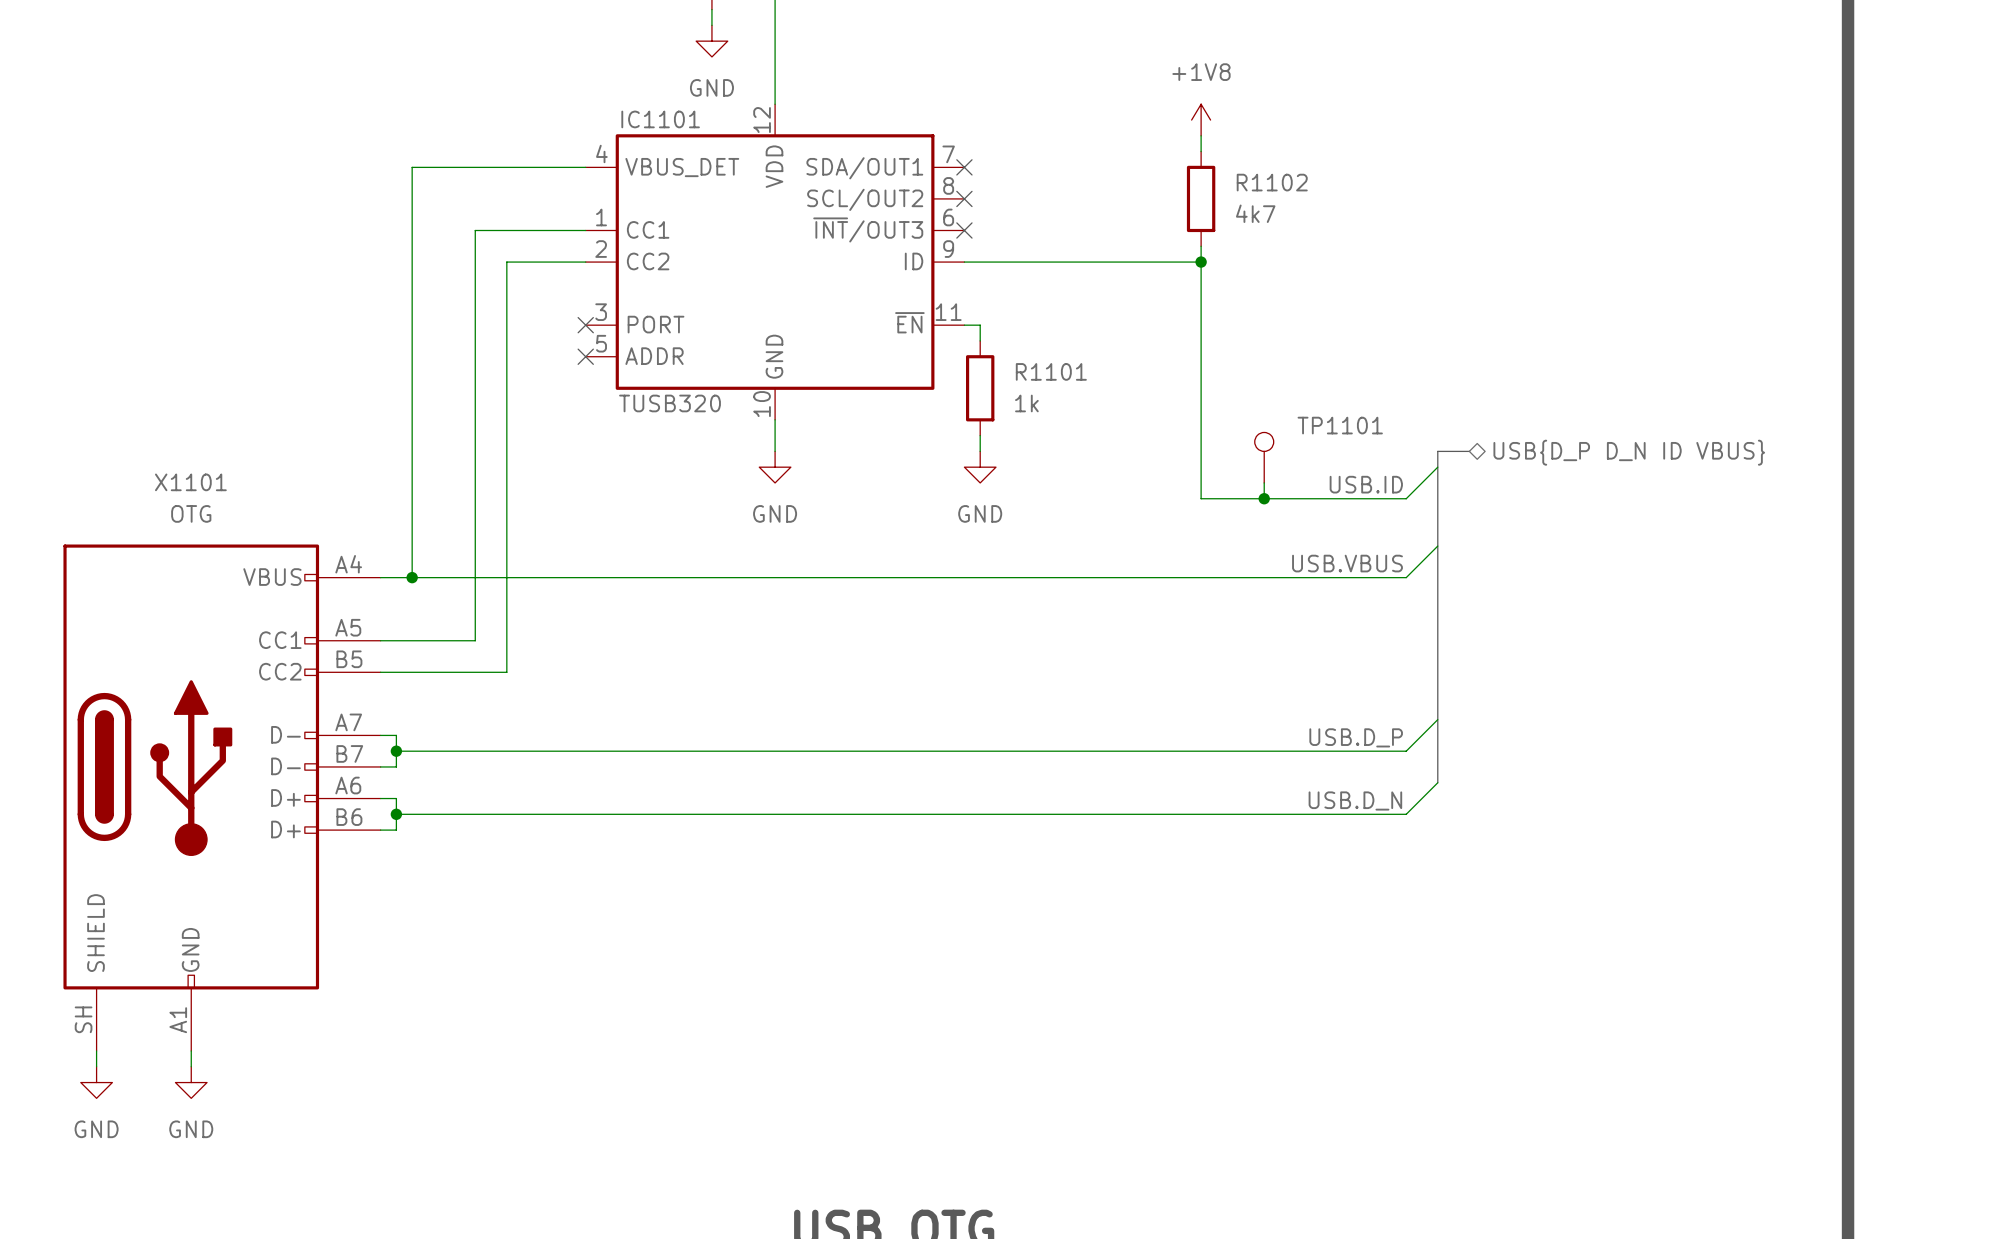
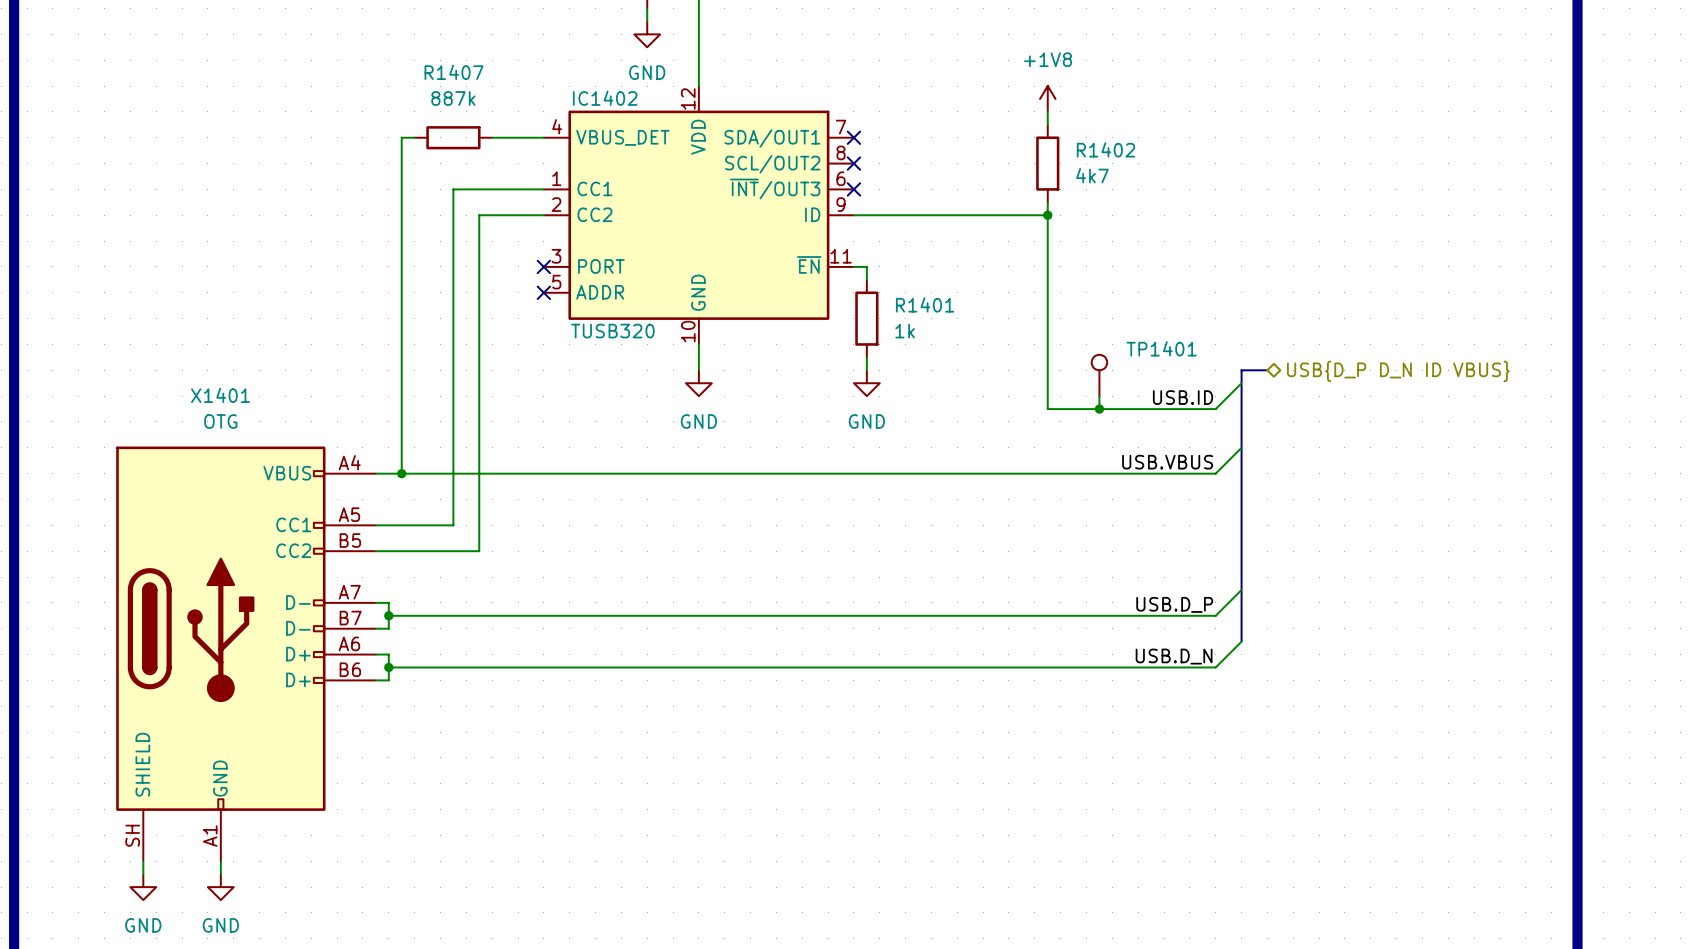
IC1101 name: IC1101 (660, 119) -> IC1402 (605, 98)
wire: (427, 167) (522, 167) -> none
R1407: none -> 887k (453, 137)
R1102 name: R1102 (1272, 182) -> R1402 (1106, 149)
R1101 name: R1101 (1051, 371) -> R1401 (925, 304)
TP1101 name: TP1101 (1340, 425) -> TP1401 (1161, 348)
X1101 name: X1101 (190, 482) -> X1401 (220, 395)

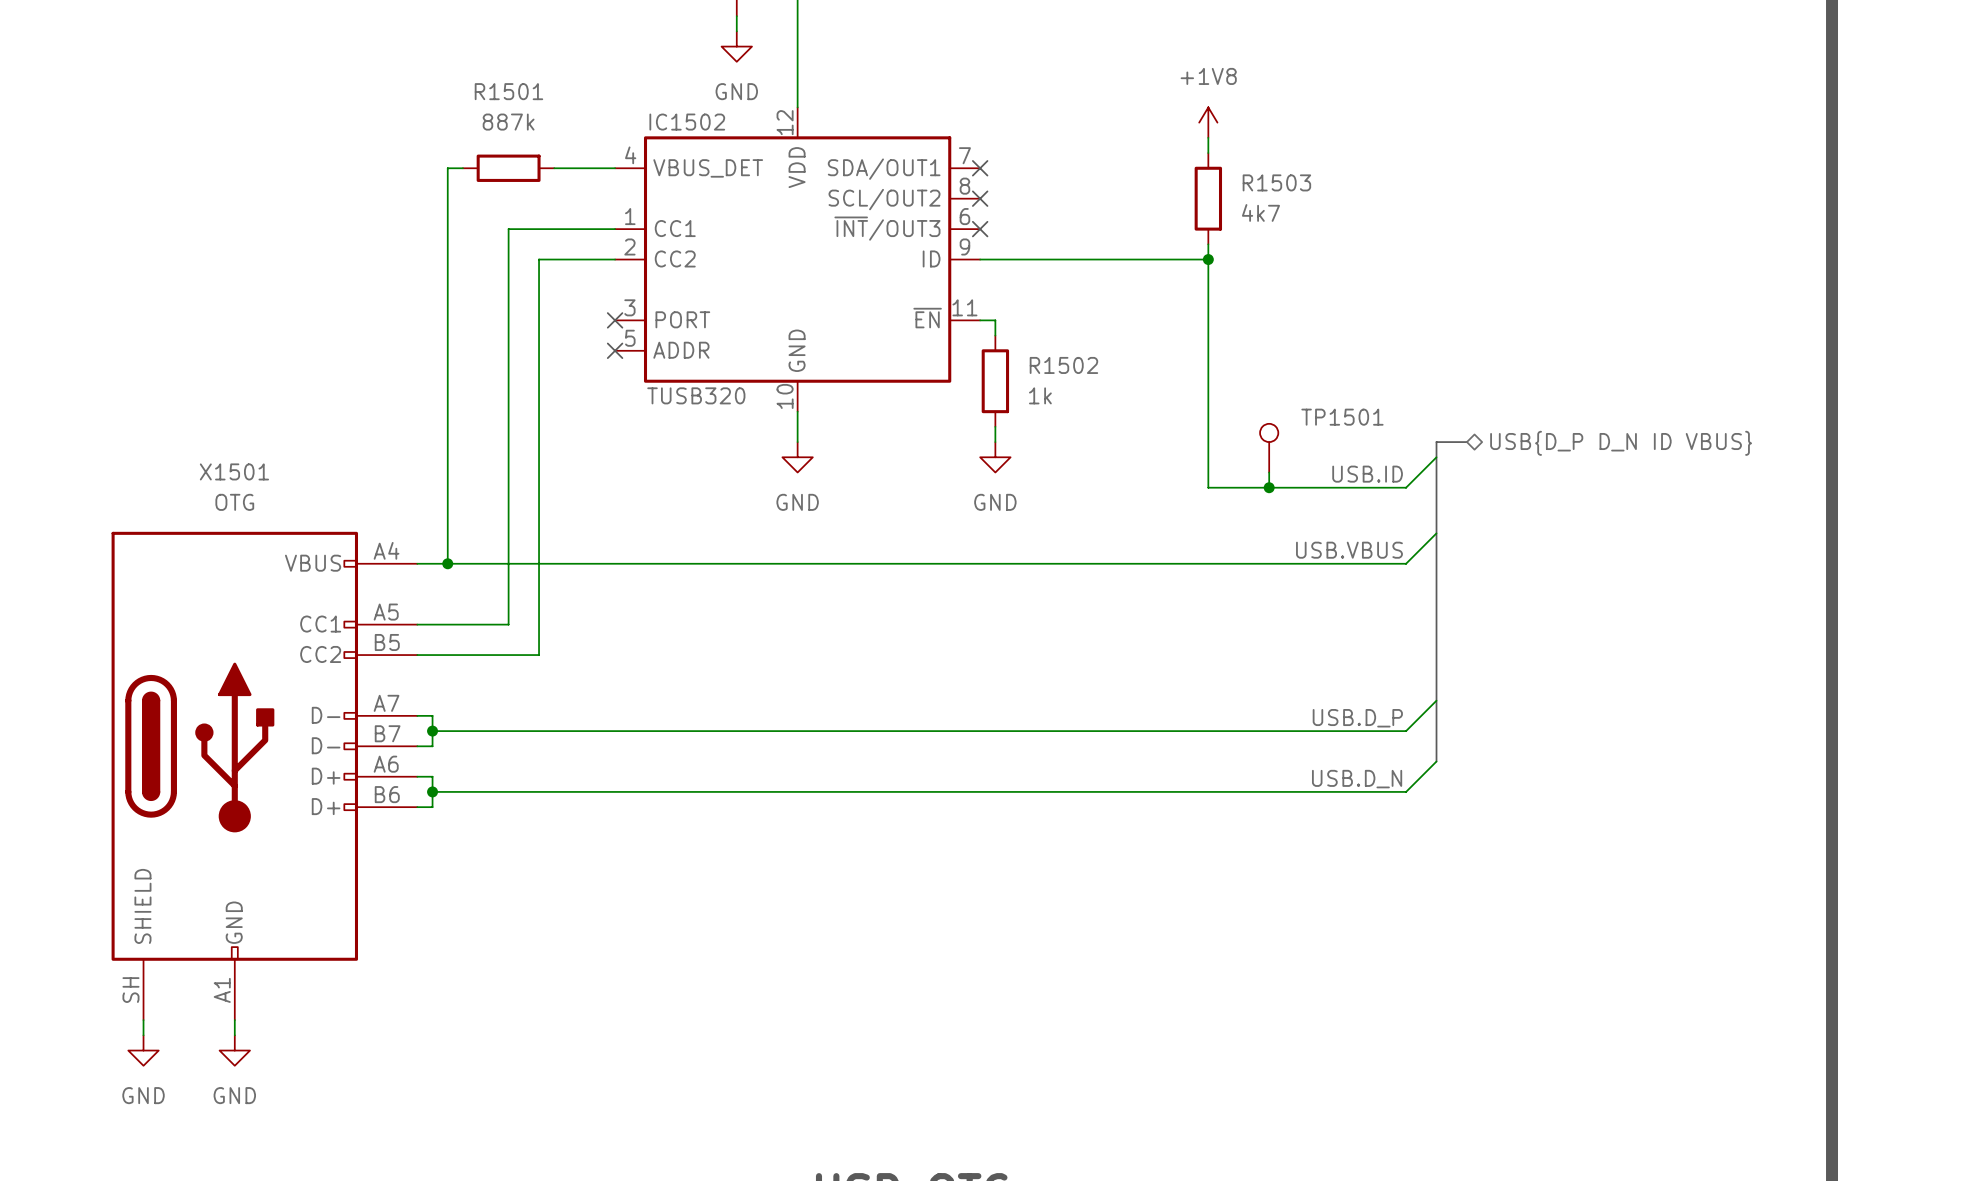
R1407 name: R1407 (454, 72) -> R1501 (508, 91)
IC1402 name: IC1402 (605, 98) -> IC1502 (687, 122)
R1402 name: R1402 (1106, 149) -> R1503 (1276, 182)
R1401 name: R1401 (925, 304) -> R1502 (1063, 365)
TP1401 name: TP1401 (1161, 348) -> TP1501 (1342, 417)
X1401 name: X1401 (220, 395) -> X1501 (234, 471)

